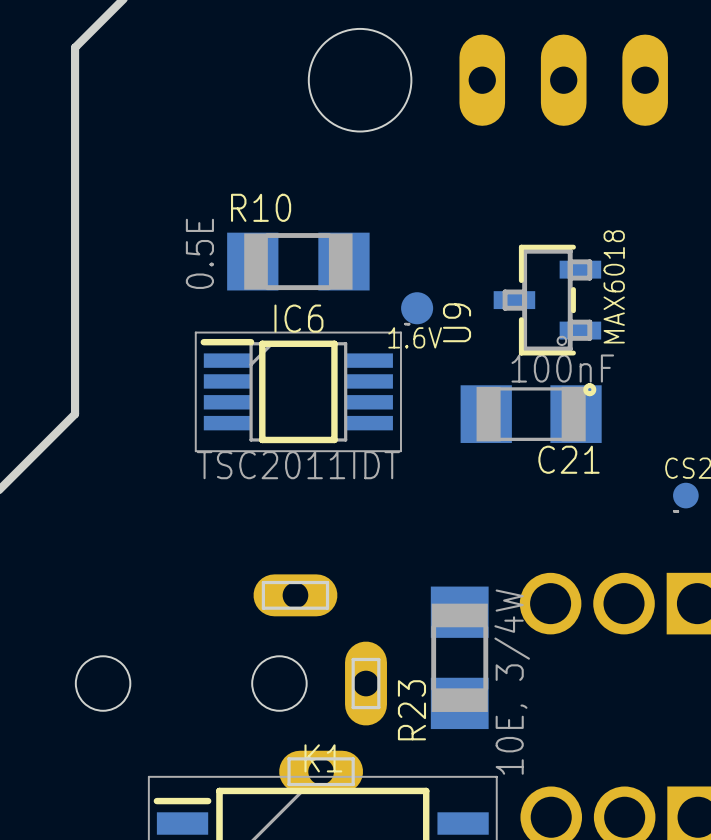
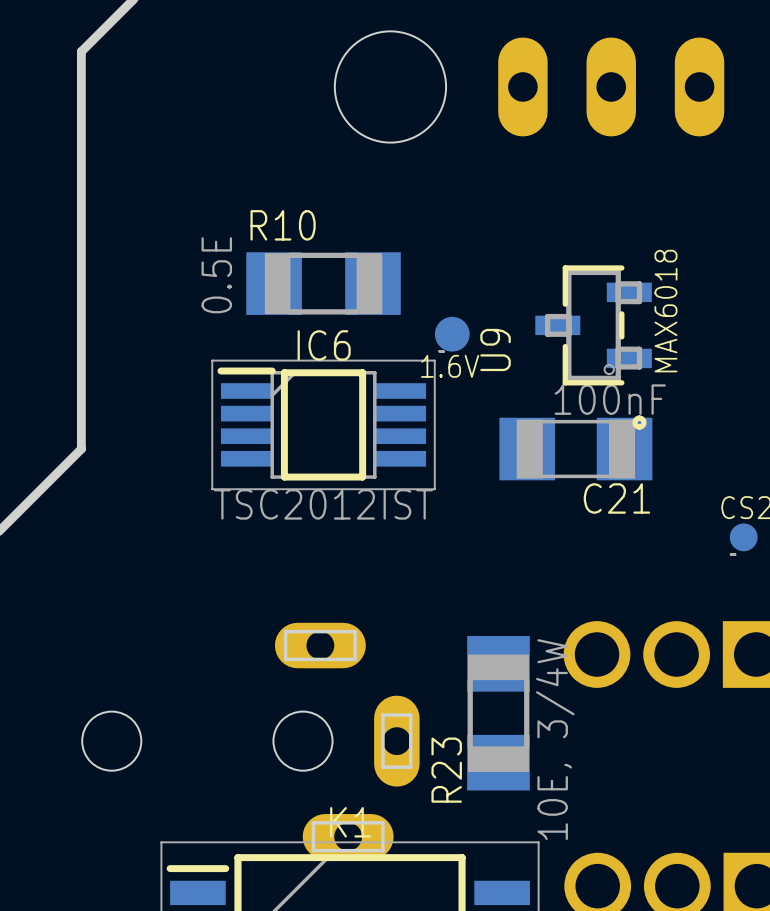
IC6 value: TSC2011IDT (298, 465) -> TSC2012IST (323, 504)

